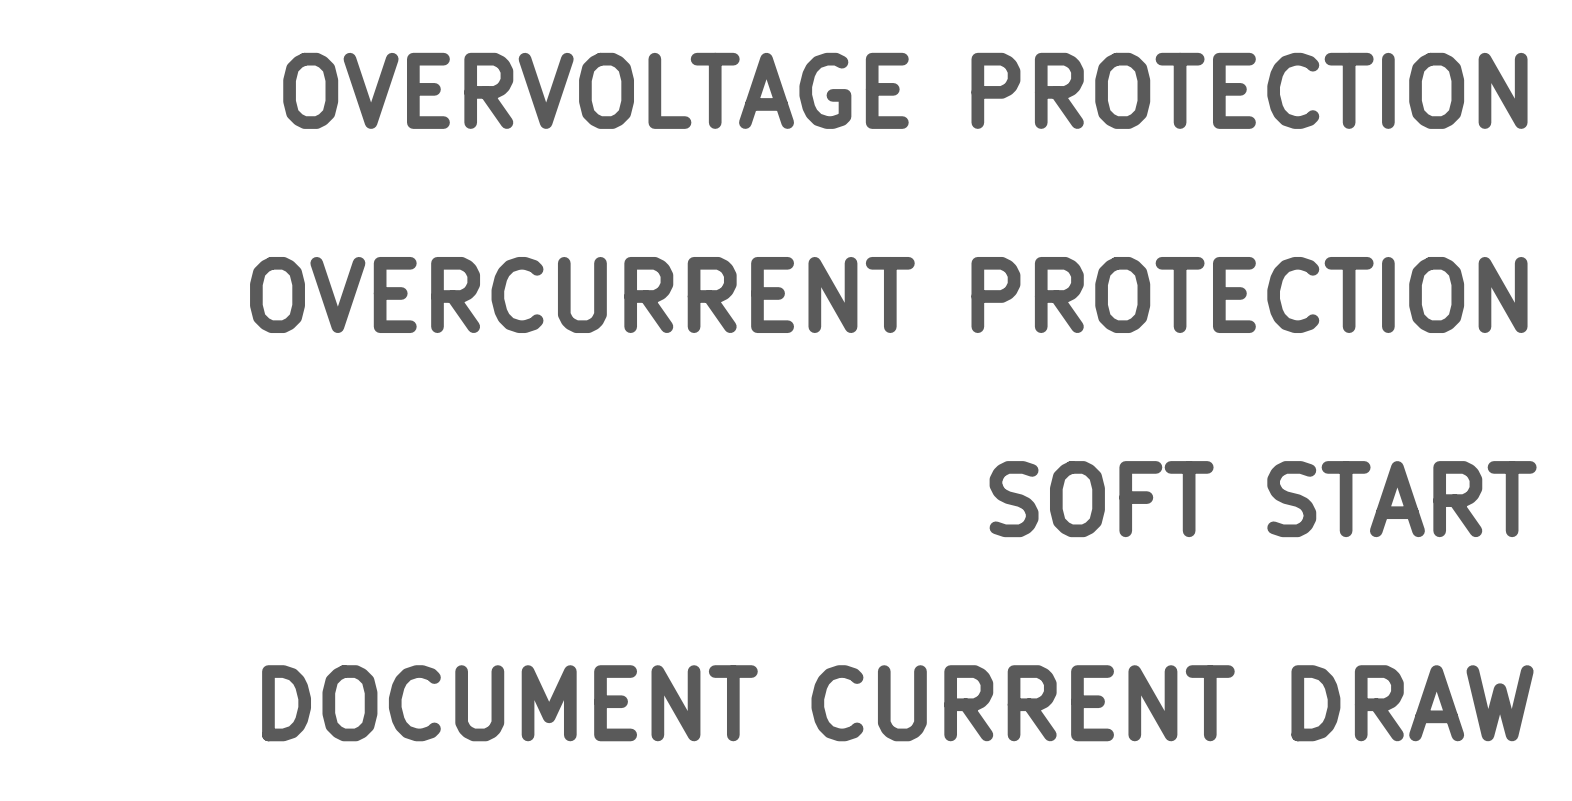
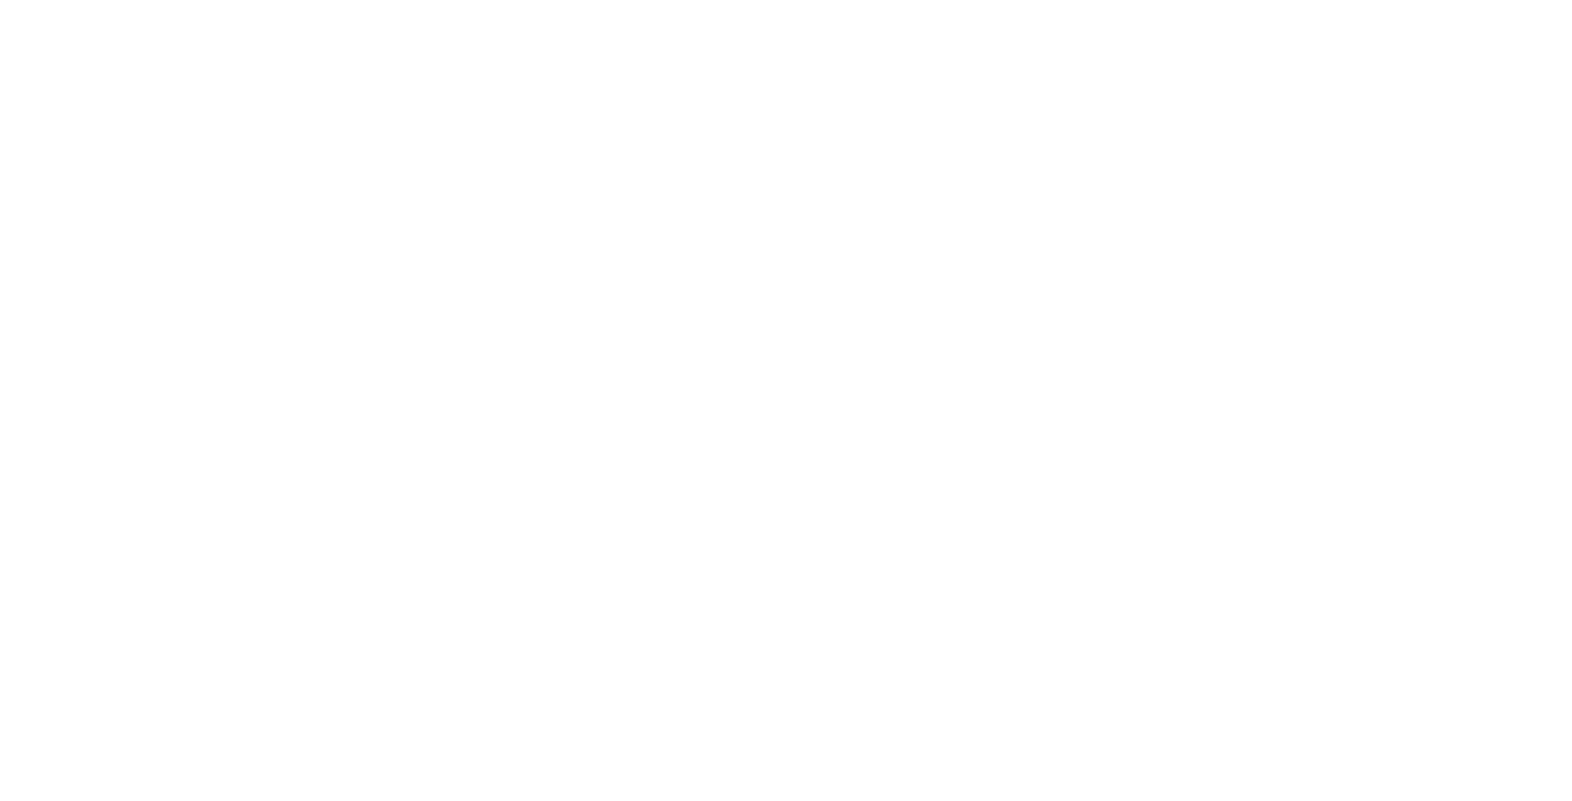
text: OVERVOLTAGE PROTECTION (905, 90) -> none
text: OVERCURRENT PROTECTION (888, 294) -> none
text: SOFT START (1263, 499) -> none
text: DOCUMENT CURRENT DRAW (897, 703) -> none

